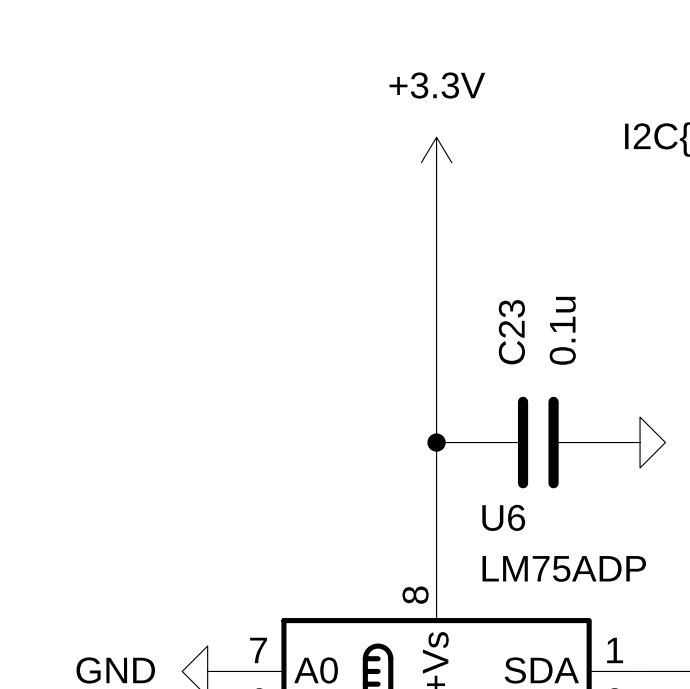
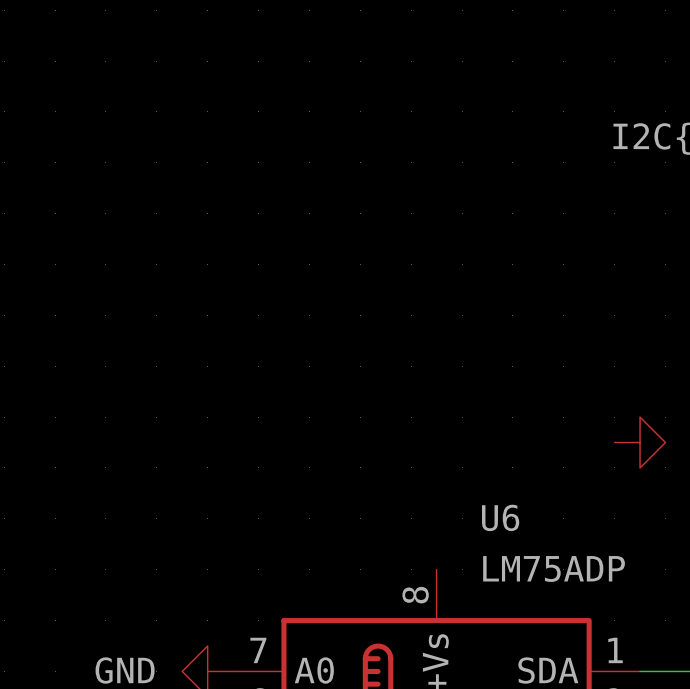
power symbol: +3.3V (436, 162) -> none
wire: (436, 188) (436, 569) -> none
wire: (436, 442) (462, 442) -> none
junction: (436, 442) -> none
C23: 0.1u (538, 442) -> none

